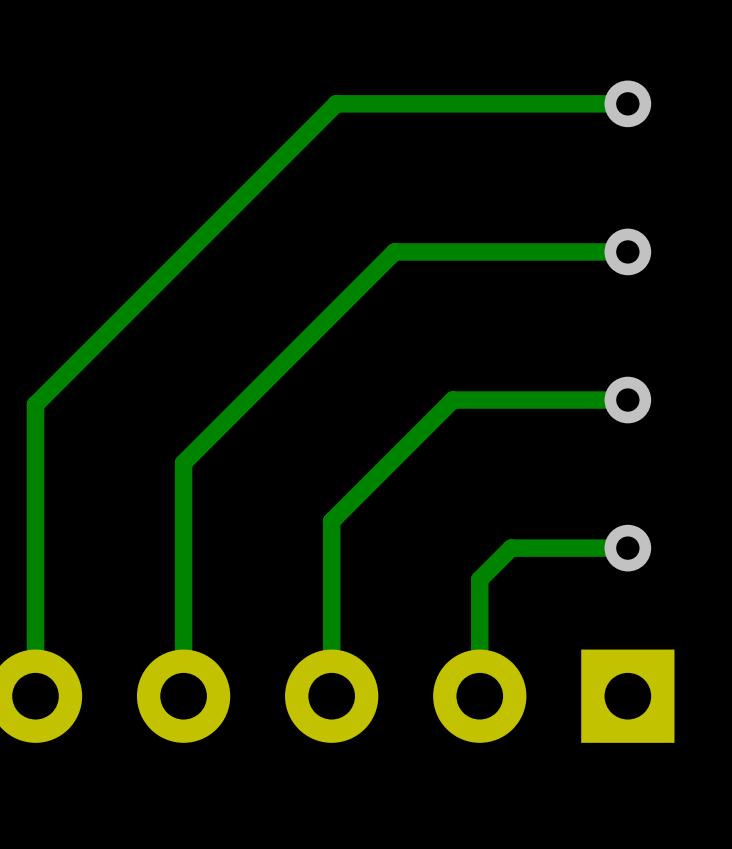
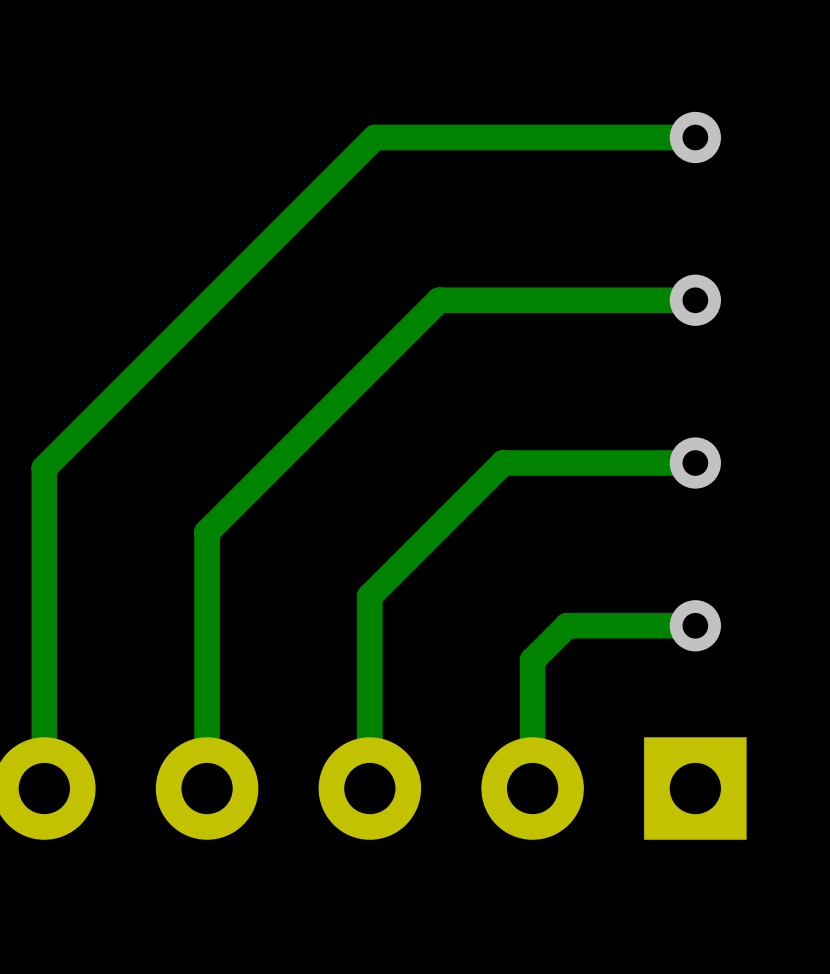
track width: thin (627, 103) (336, 103) (35, 404) (35, 696) -> thick (695, 137) (374, 137) (44, 468) (44, 788)
track width: thin (627, 251) (394, 251) (183, 462) (183, 696) -> thick (695, 300) (439, 300) (207, 532) (207, 788)
track width: thin (627, 400) (452, 400) (331, 521) (331, 696) -> thick (695, 463) (503, 463) (369, 596) (369, 788)
track width: thin (627, 548) (511, 548) (479, 579) (479, 696) -> thick (695, 625) (567, 625) (532, 660) (532, 788)

